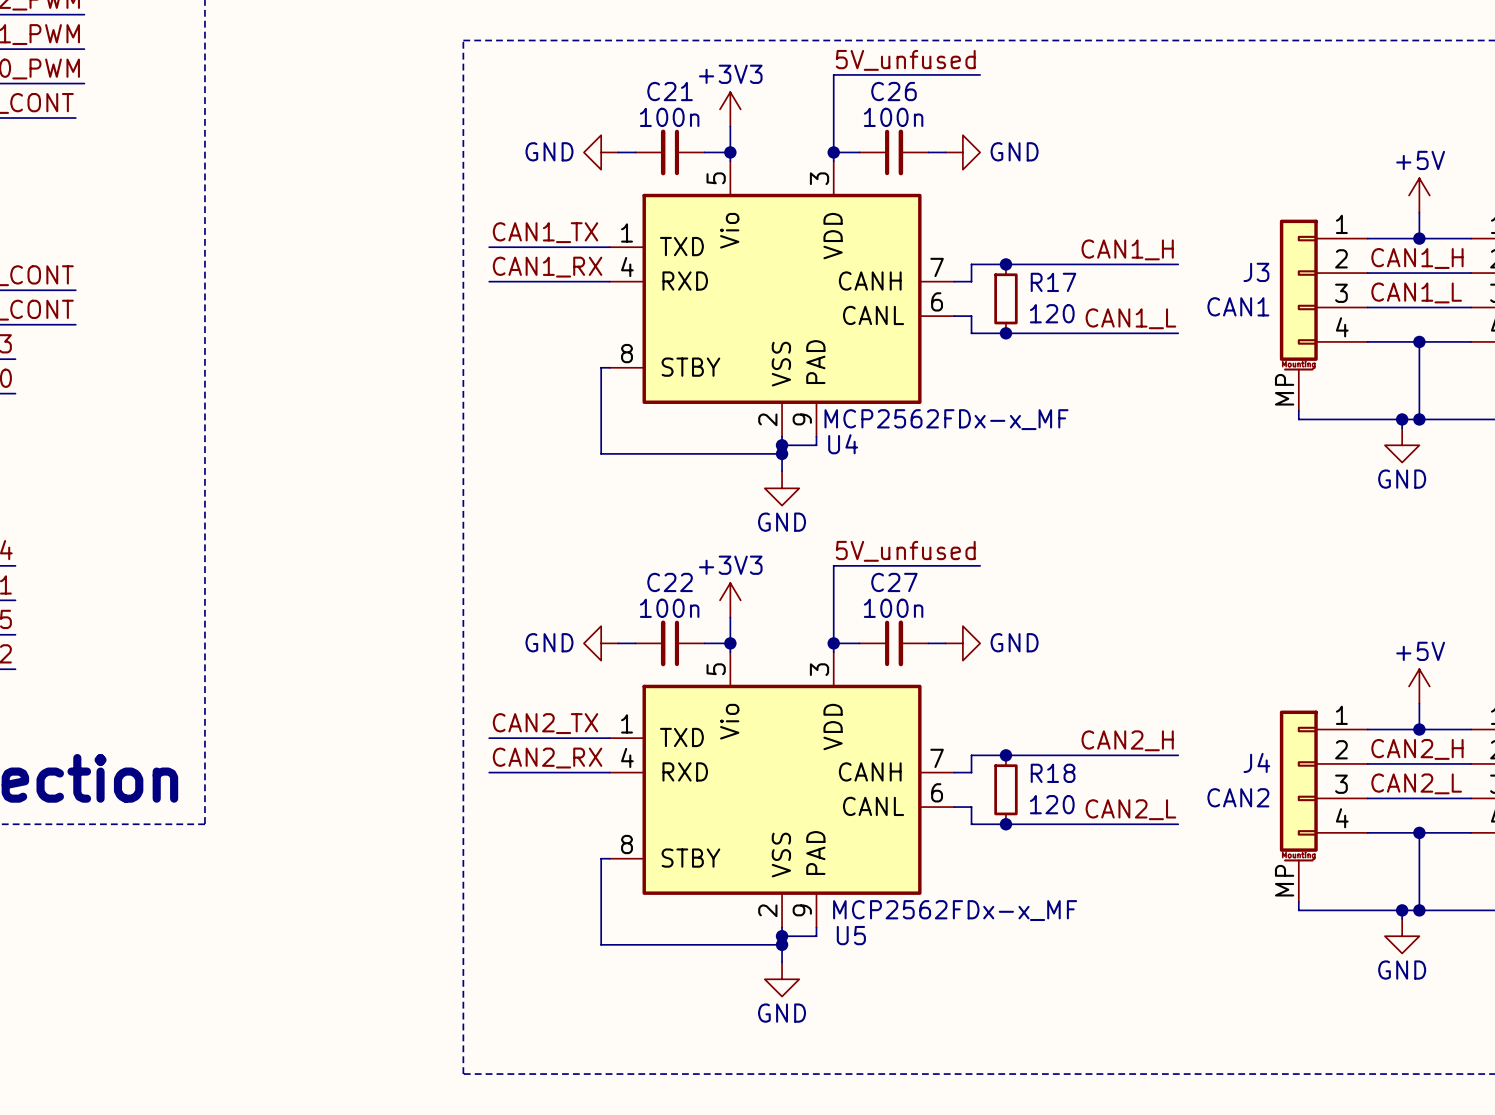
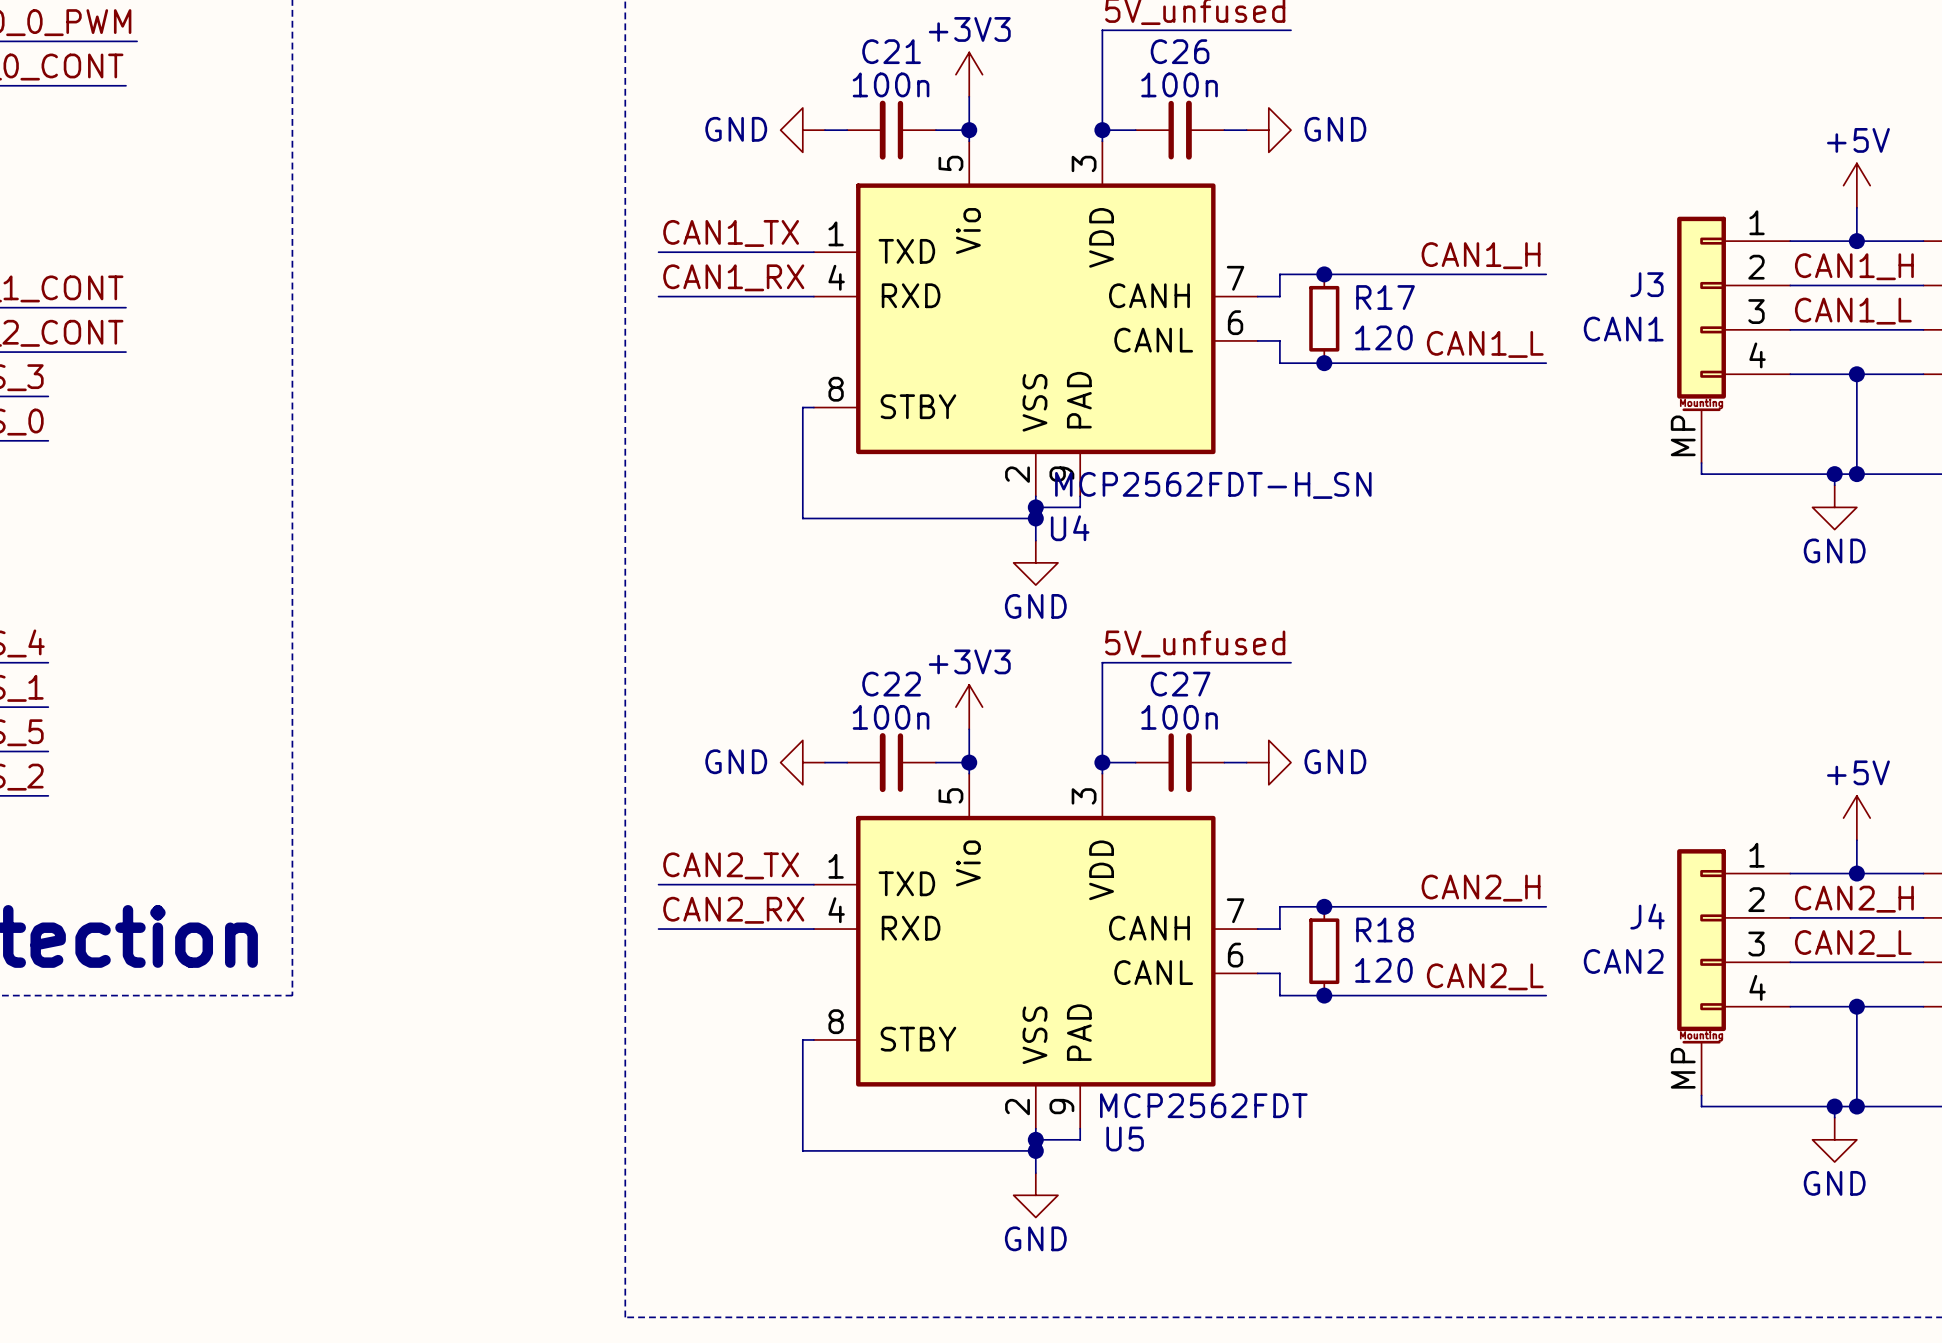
U4 value: MCP2562FDx-x_MF (946, 419) -> MCP2562FDT-H_SN (1213, 485)
U4 name position: U4 (843, 444) -> U4 (1070, 528)
U5 value: MCP2562FDx-x_MF (955, 910) -> MCP2562FDT (1203, 1105)

